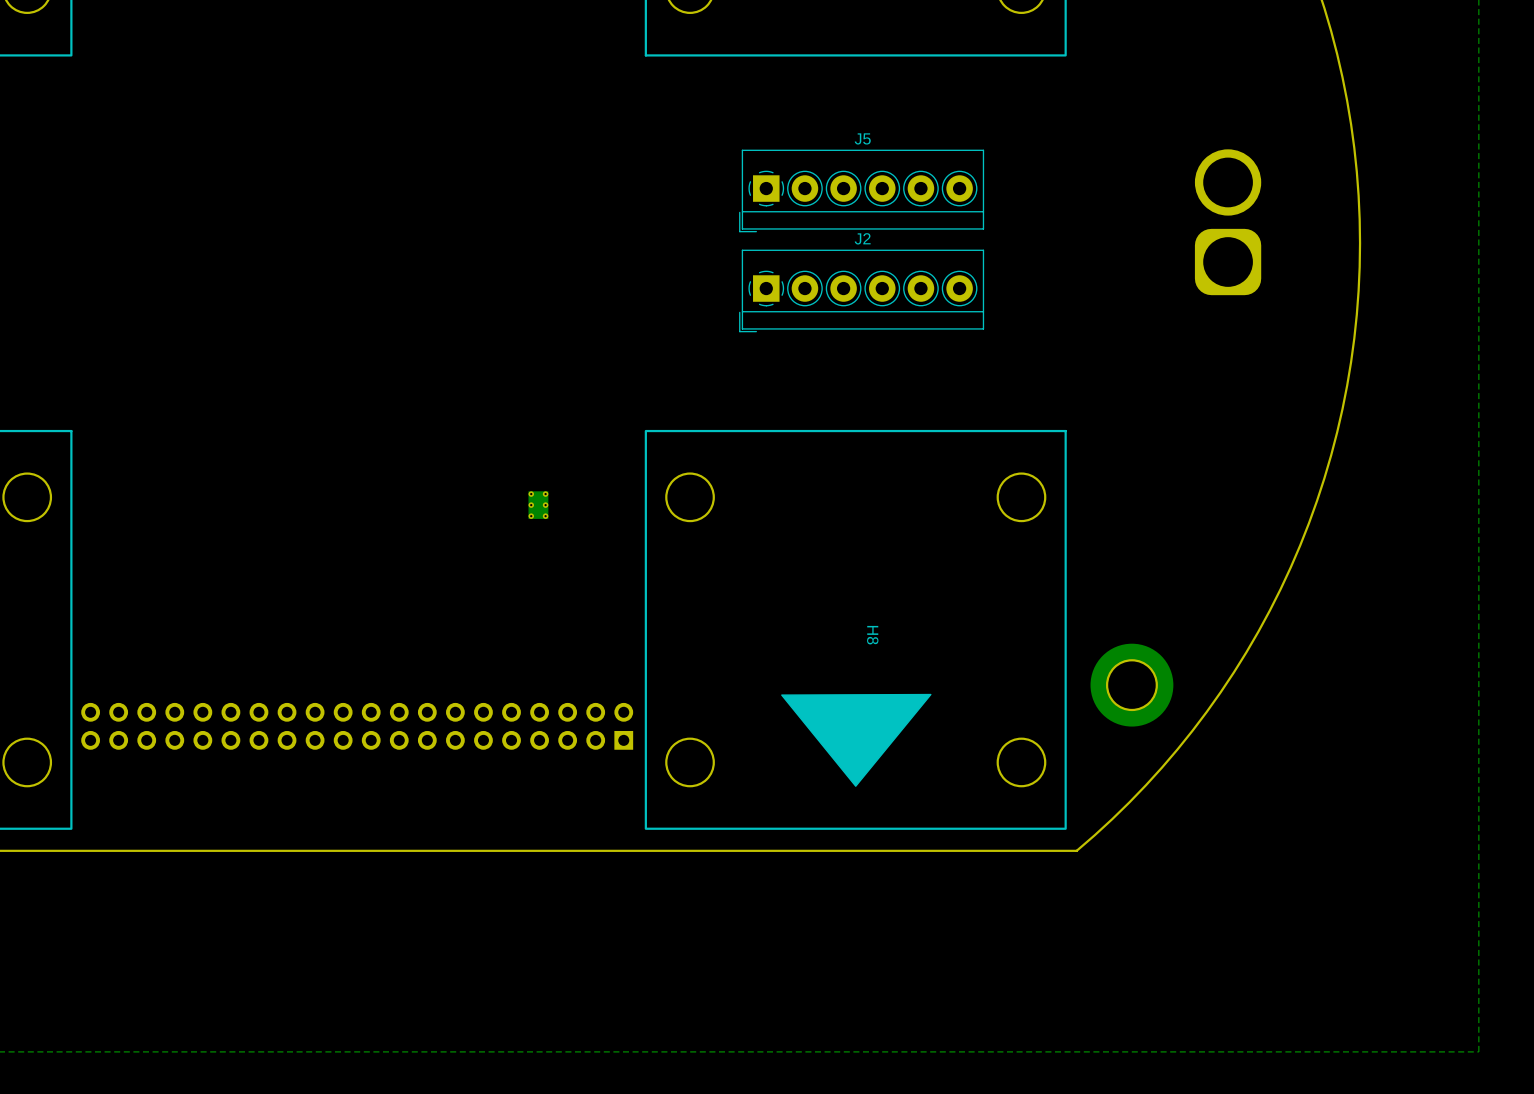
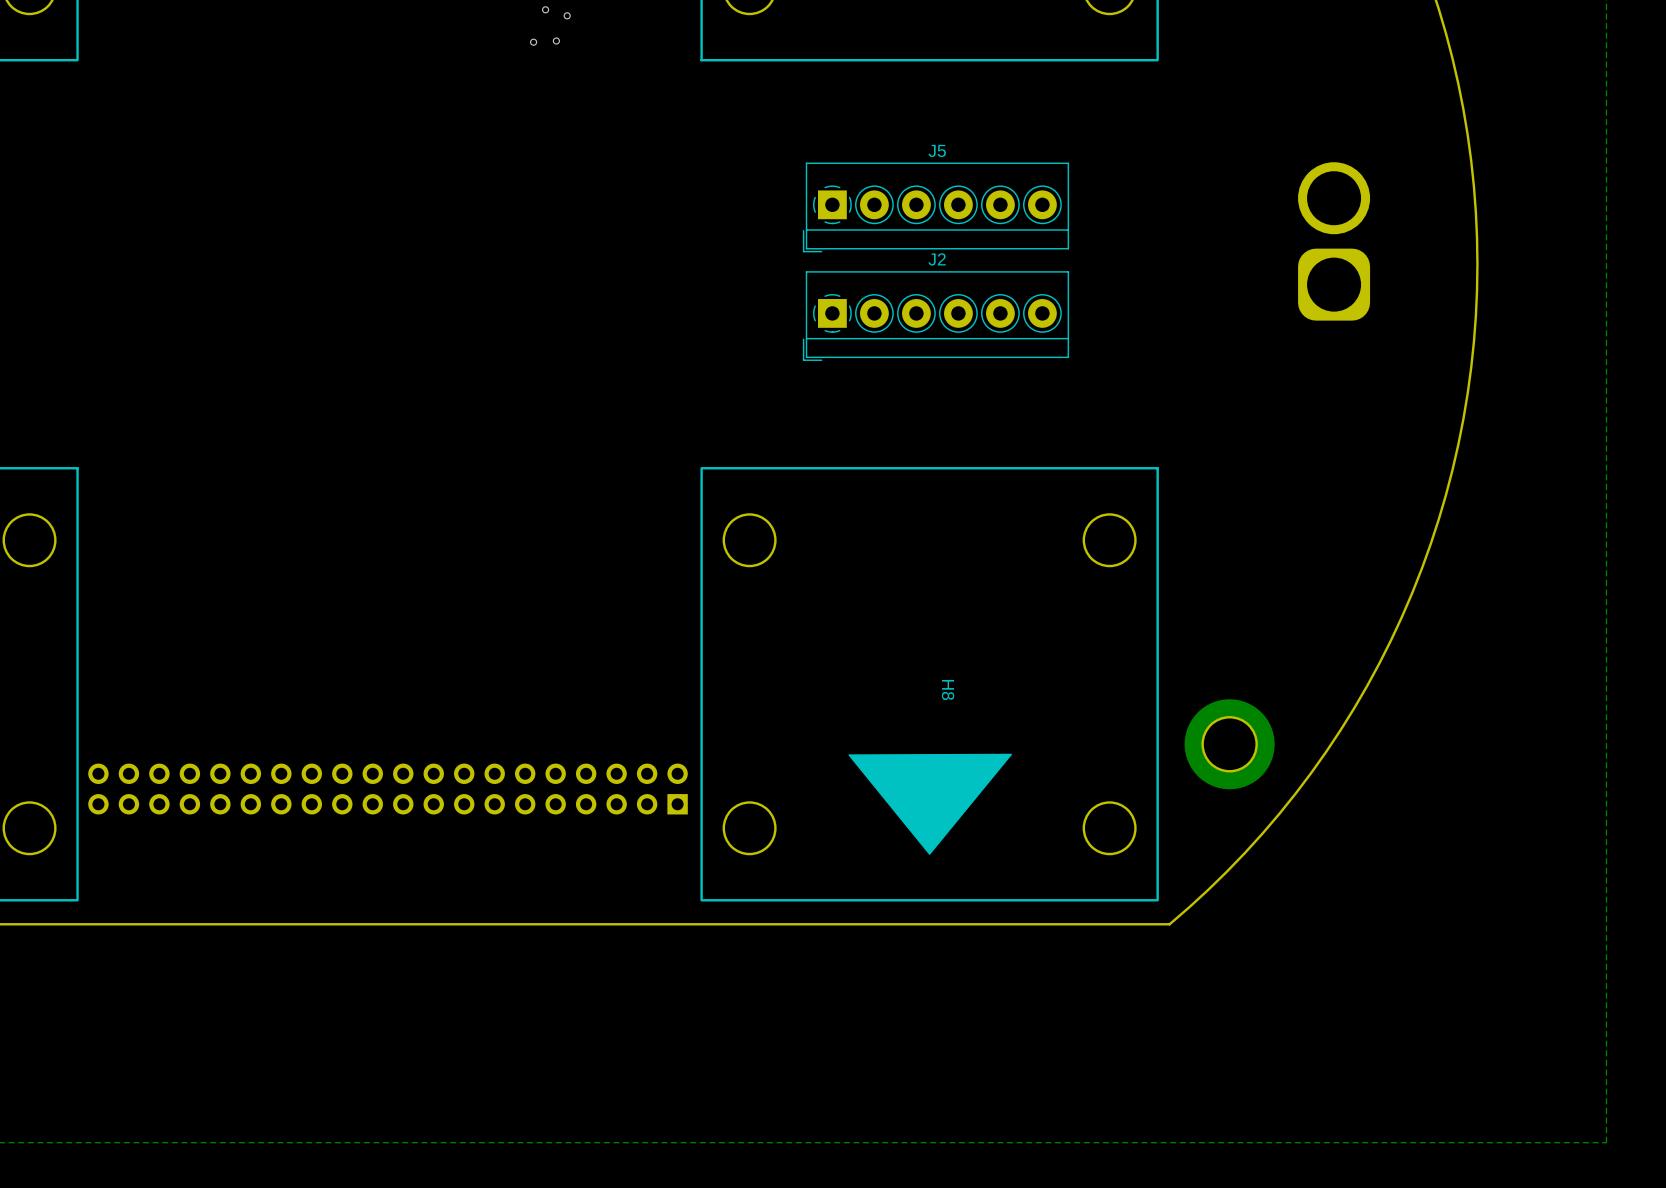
via: none -> (545, 9)
via: none -> (567, 15)
via: none -> (556, 41)
via: none -> (533, 42)
part: (538, 505) -> none

